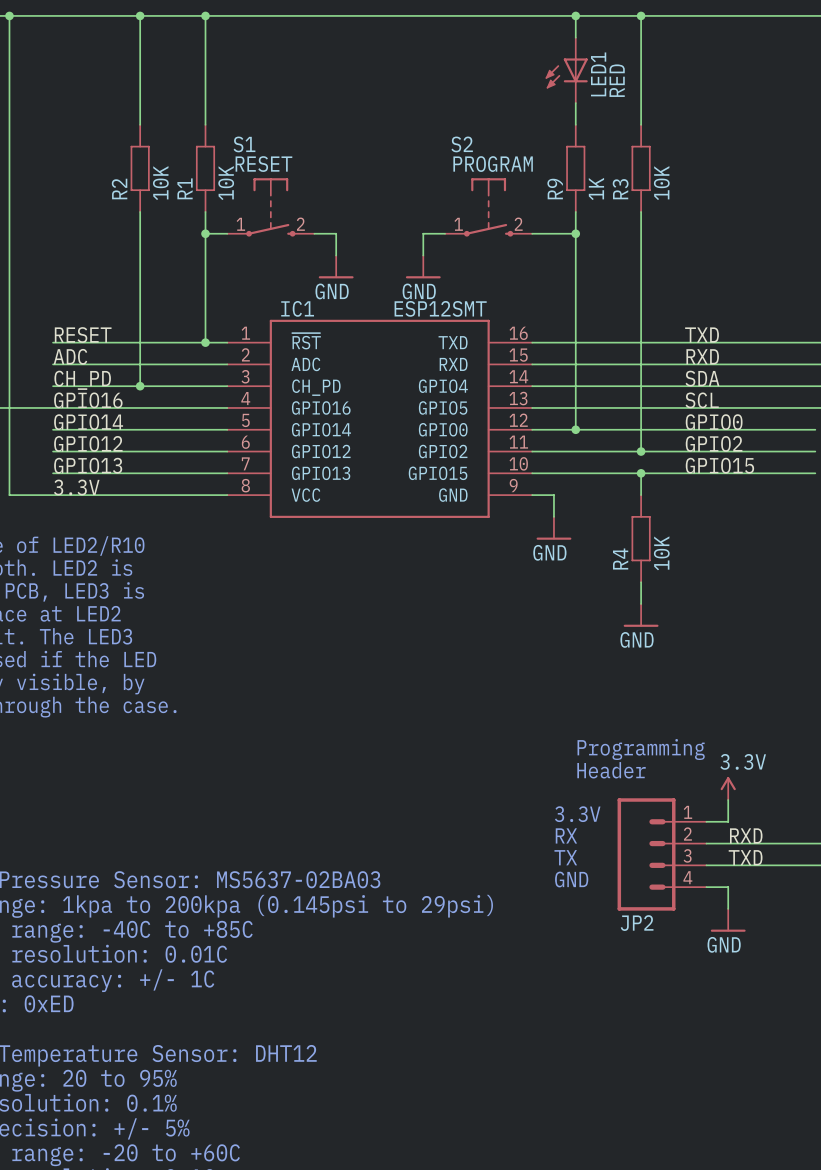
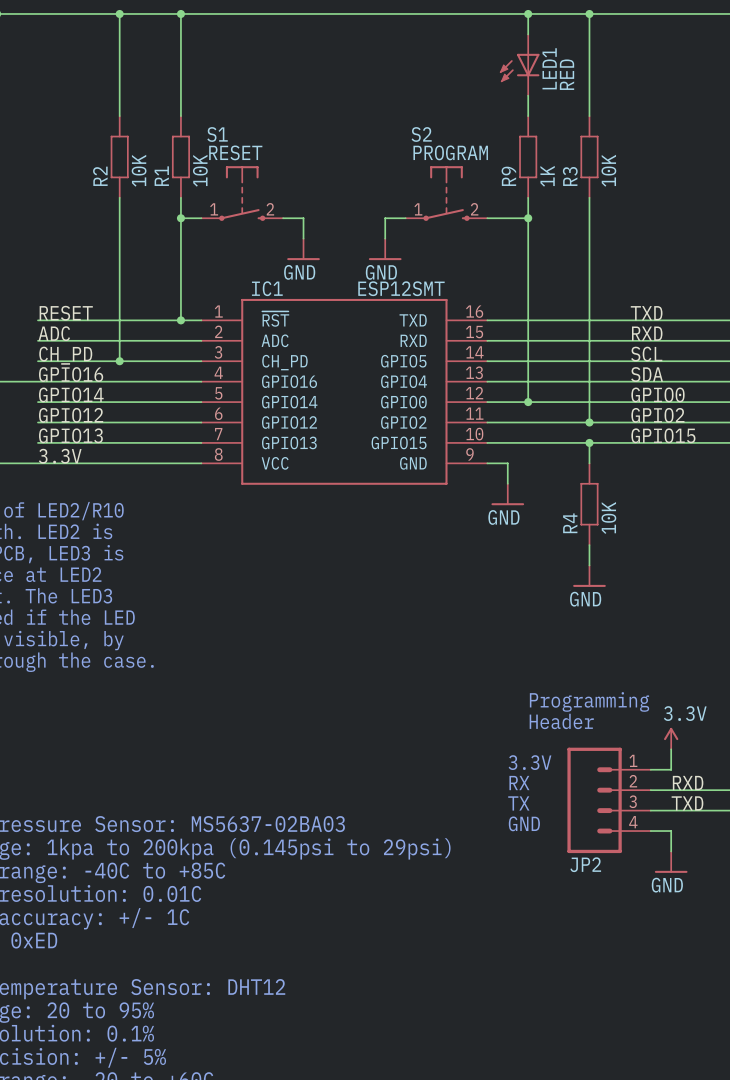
label: SDA (702, 378) -> SCL (646, 354)
IC1 pin name: GPIO4 (443, 386) -> GPIO5 (403, 361)
label: SCL (702, 400) -> SDA (647, 374)
IC1 pin name: GPIO5 (443, 407) -> GPIO4 (404, 381)

